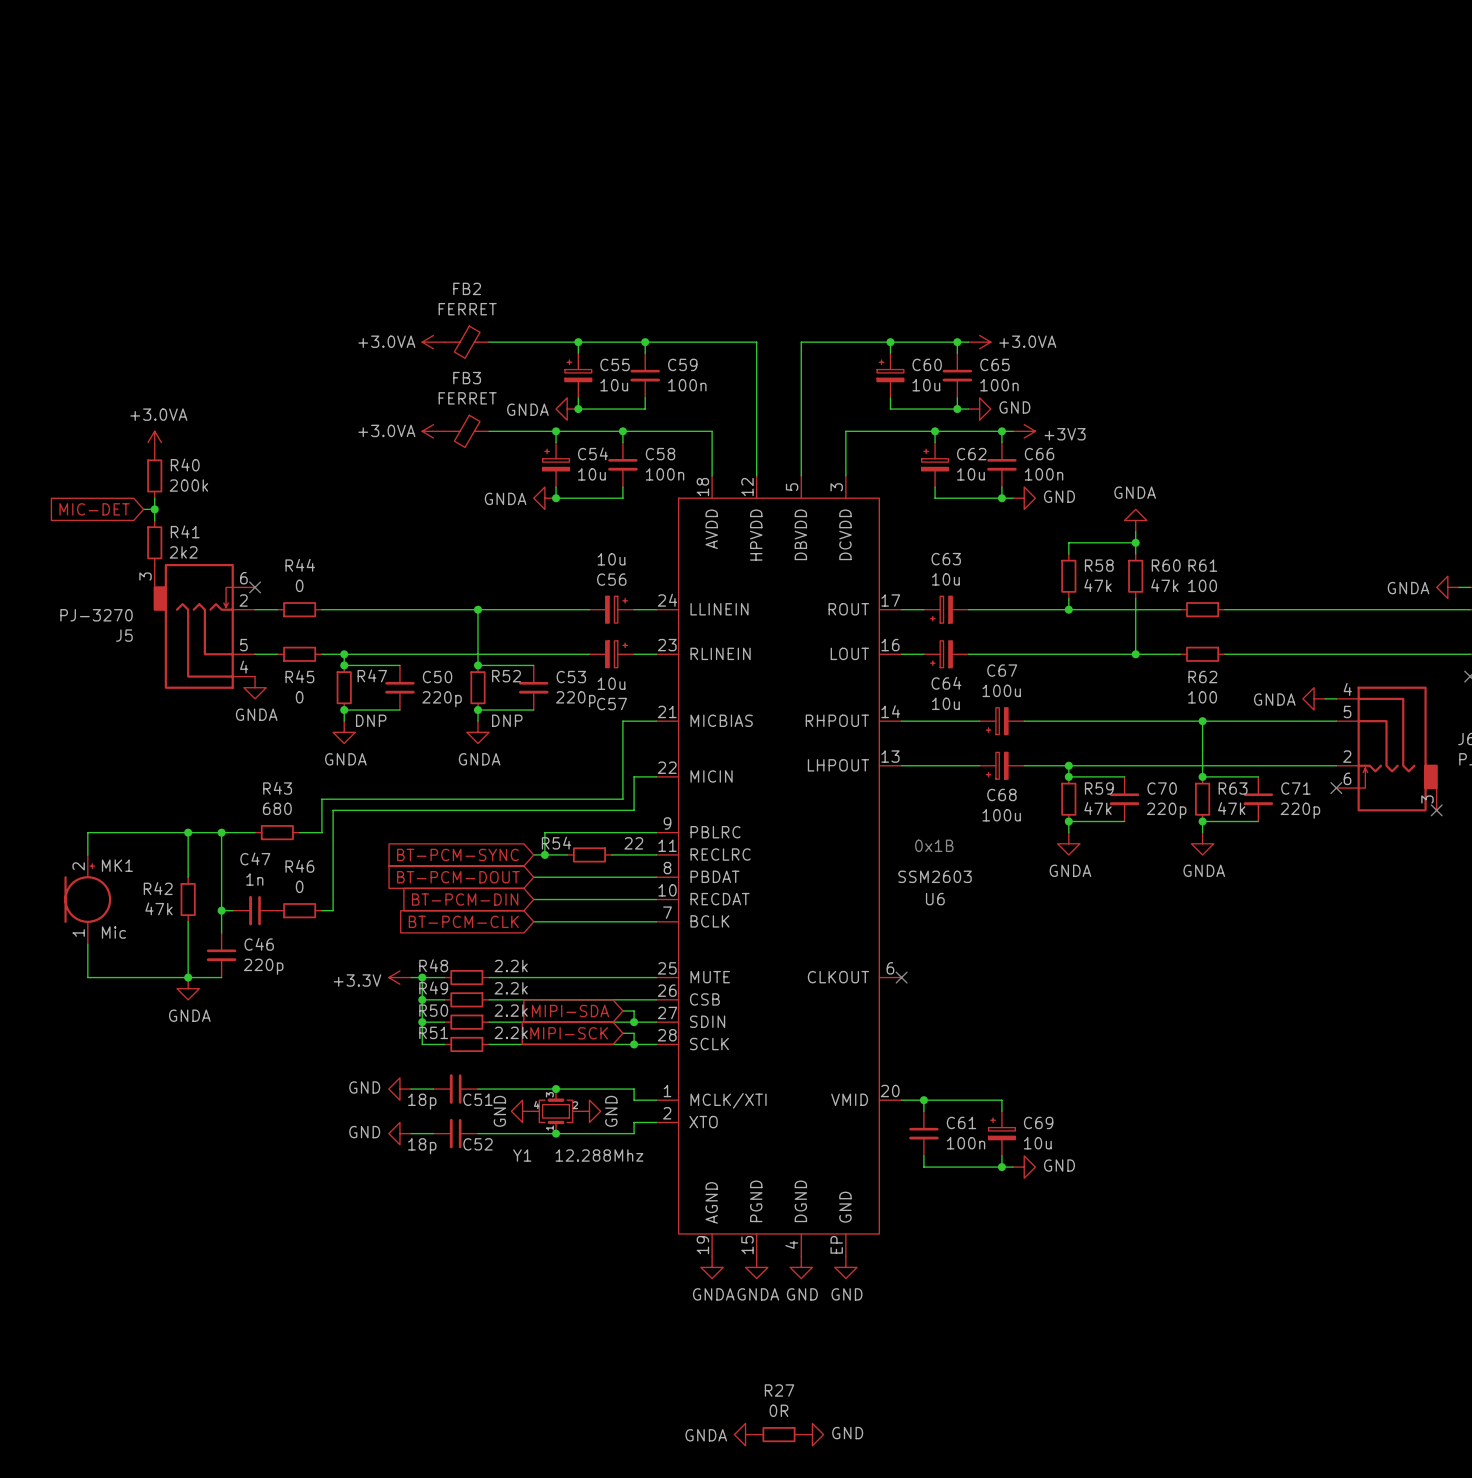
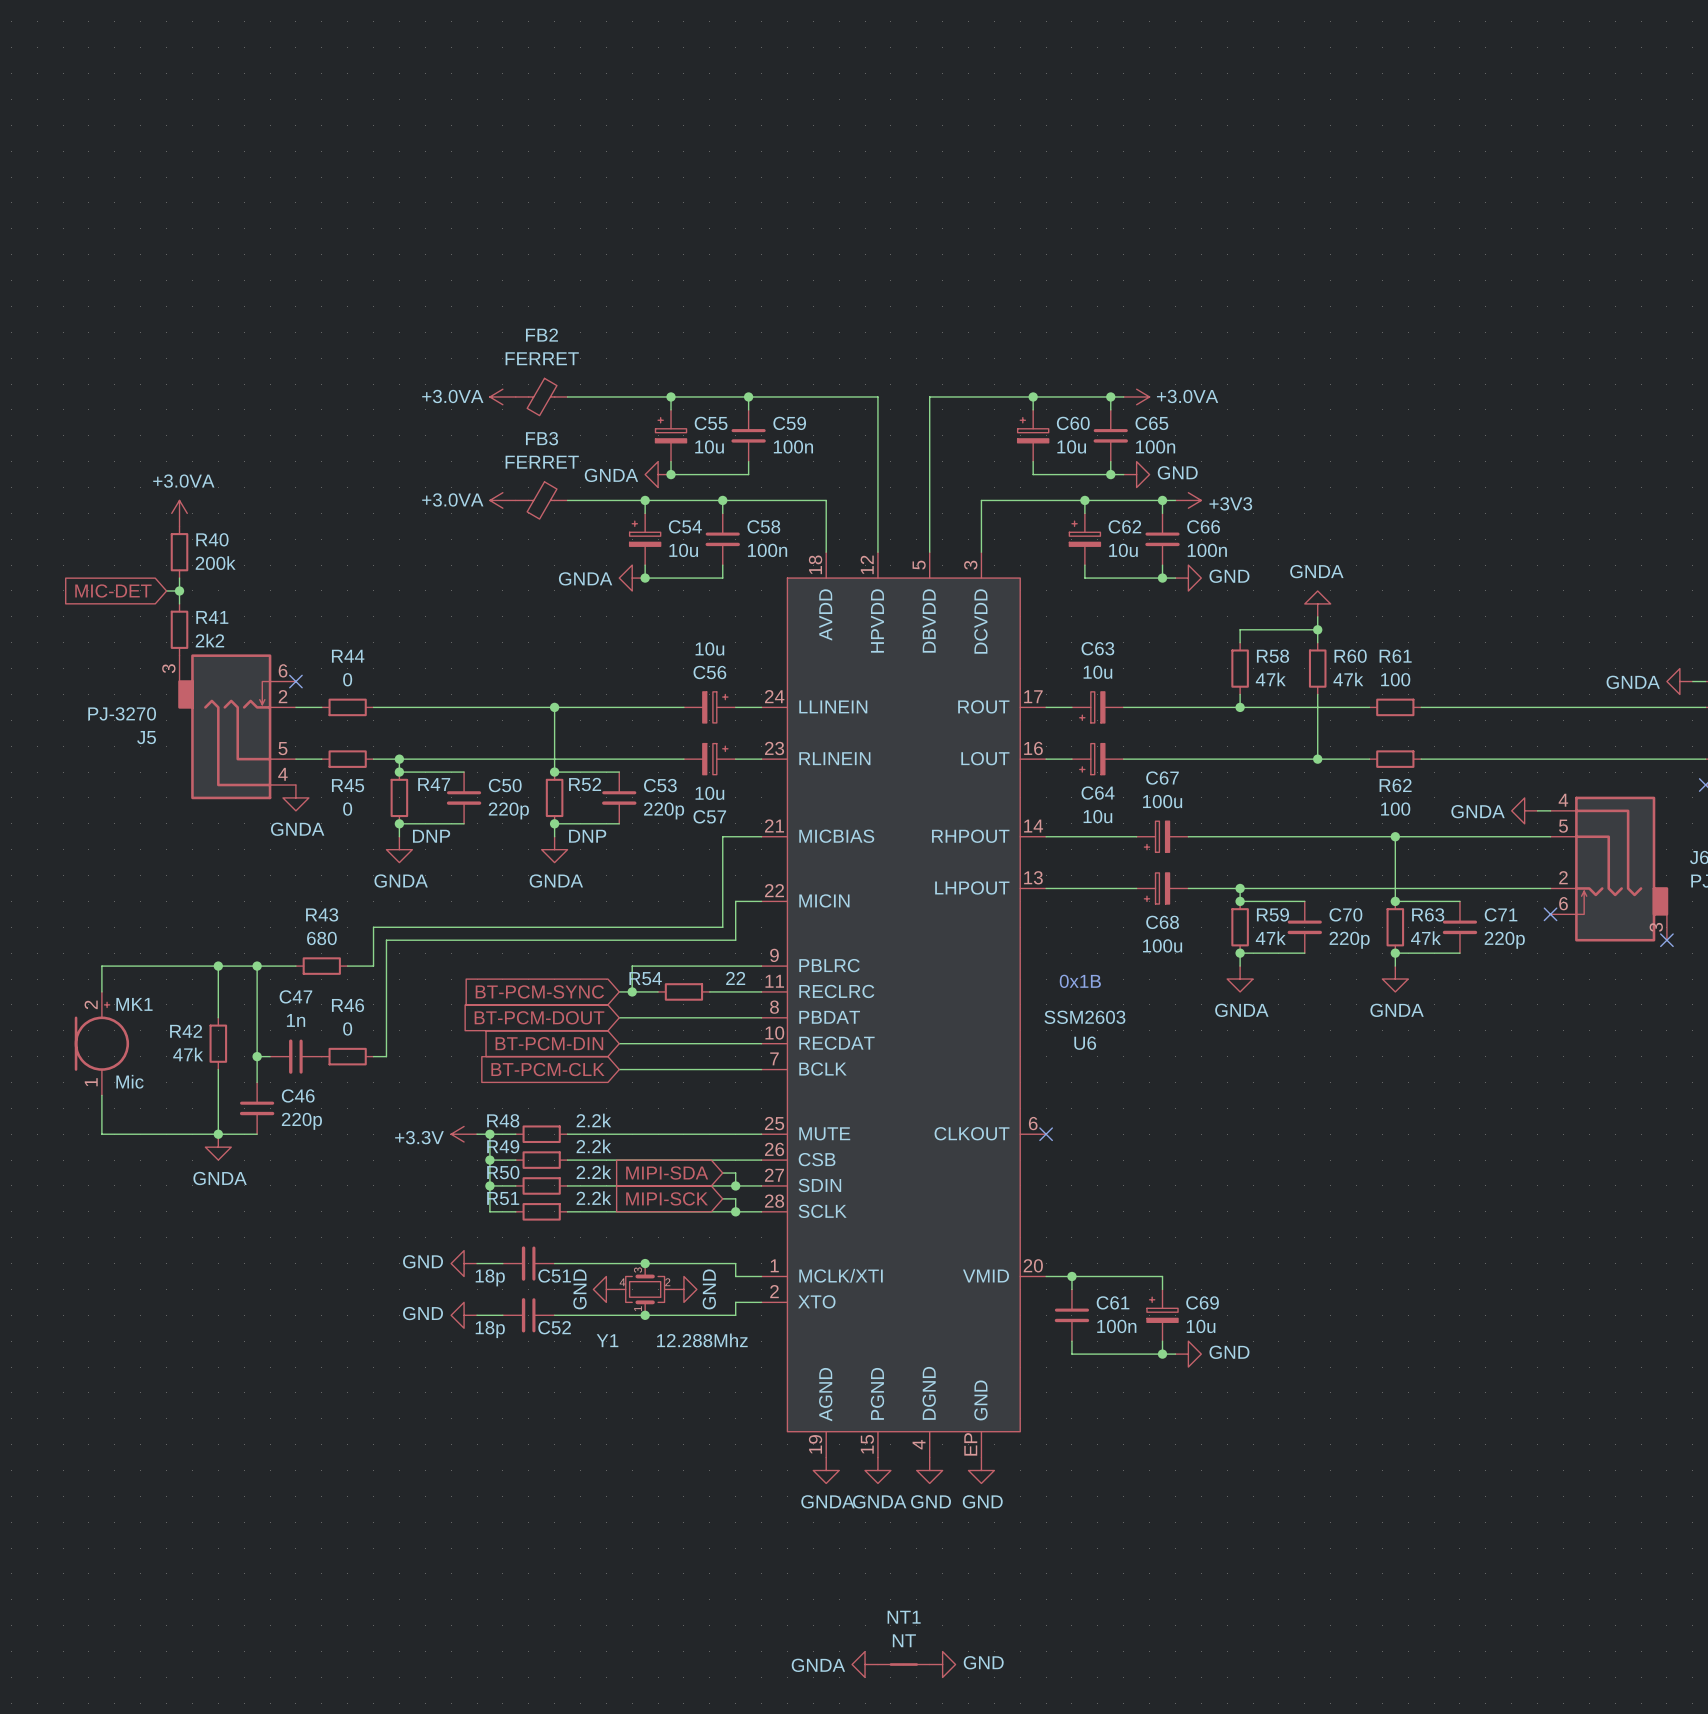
R27: 0R (778, 1434) -> none
NT1: none -> NT (903, 1664)

